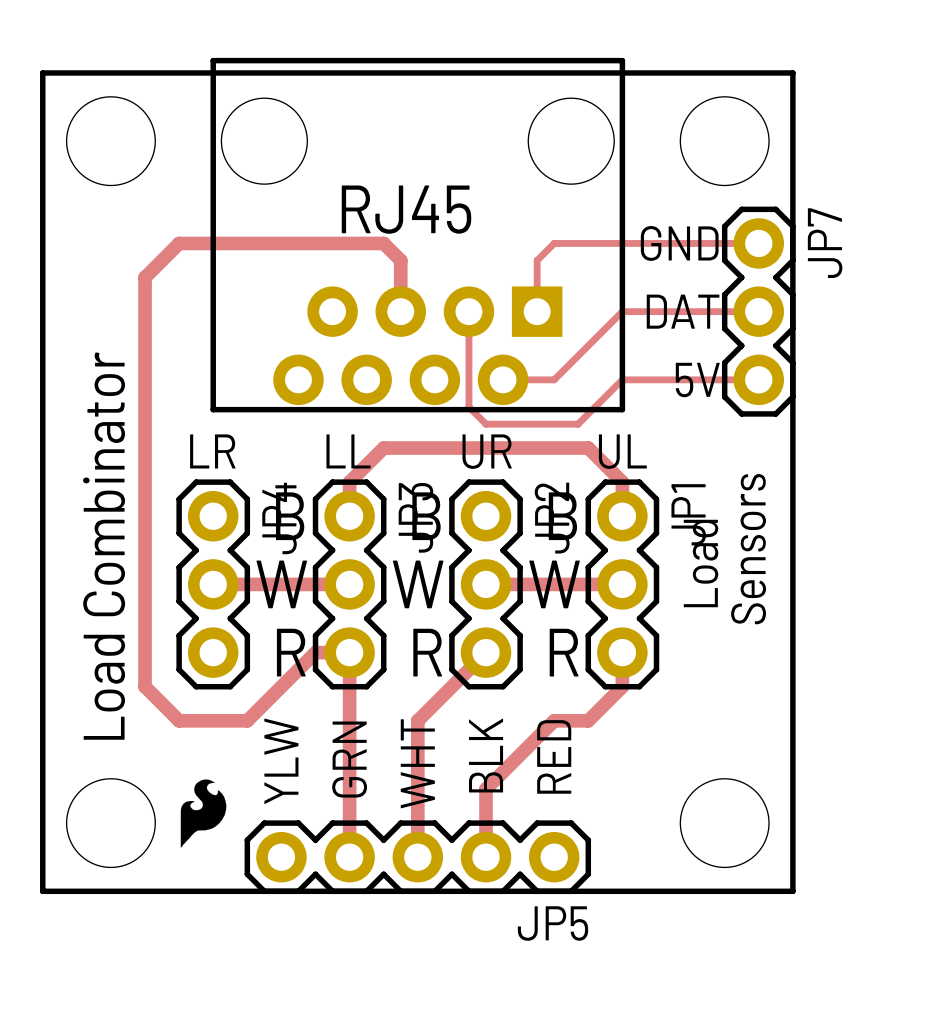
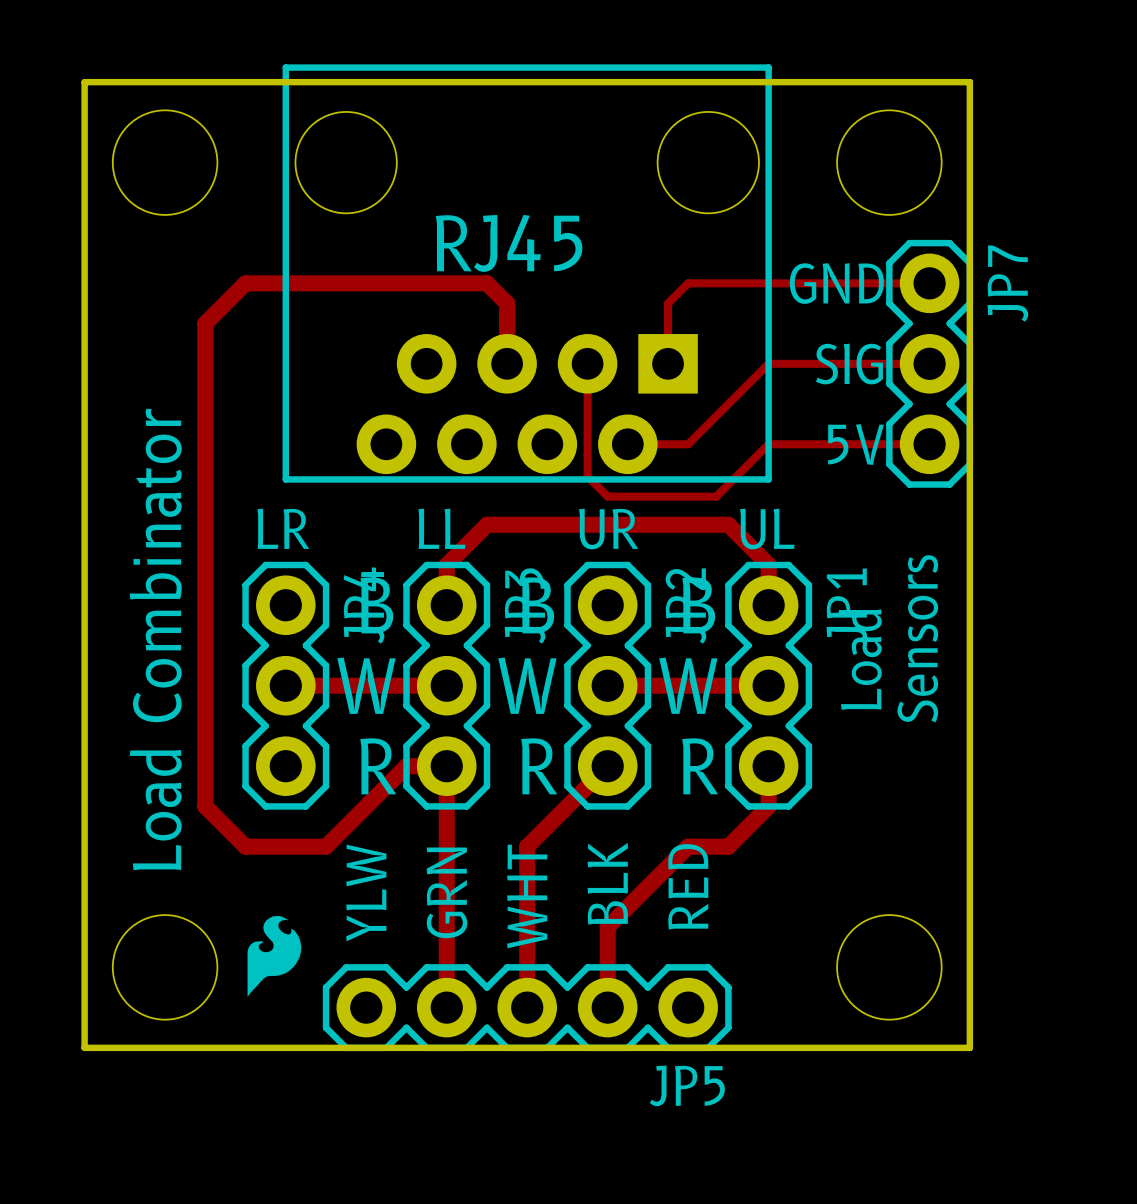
text: DAT (683, 311) -> SIG (849, 364)

